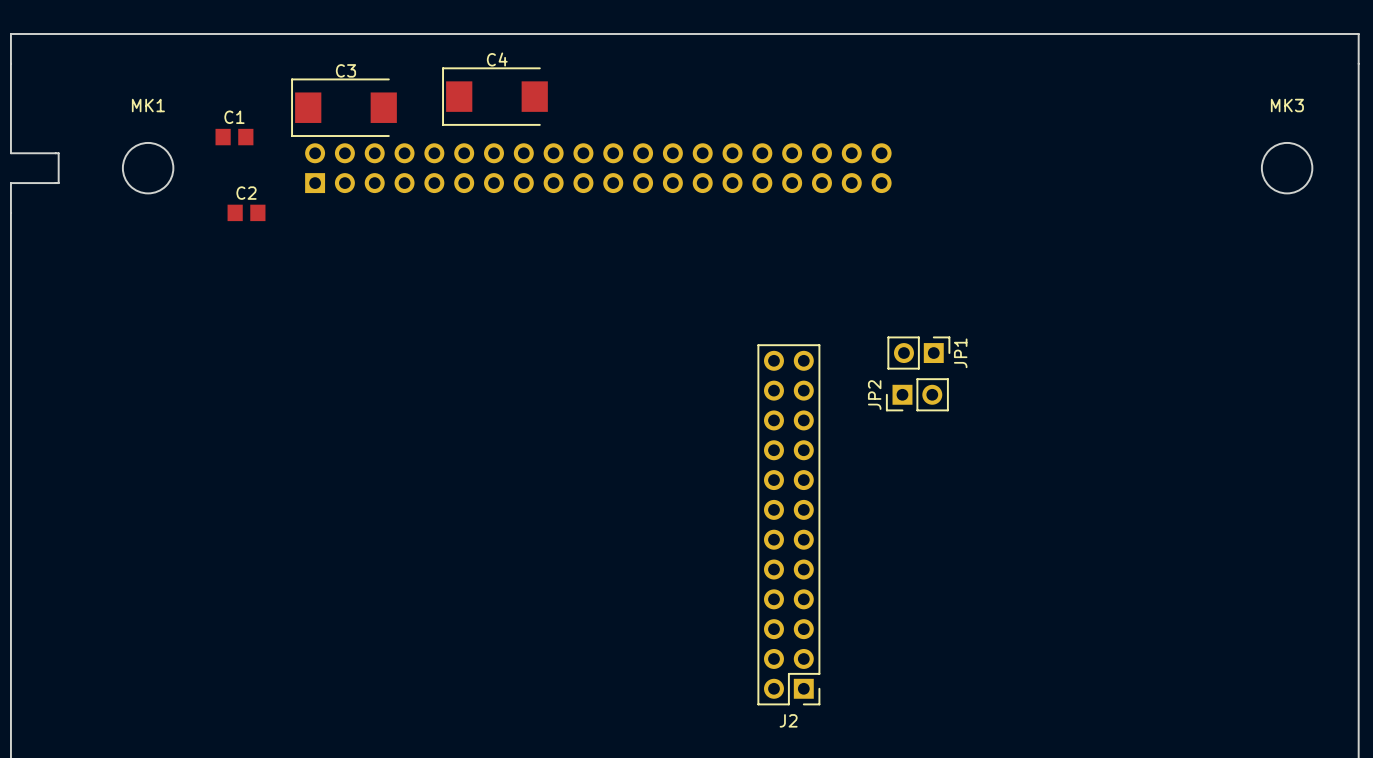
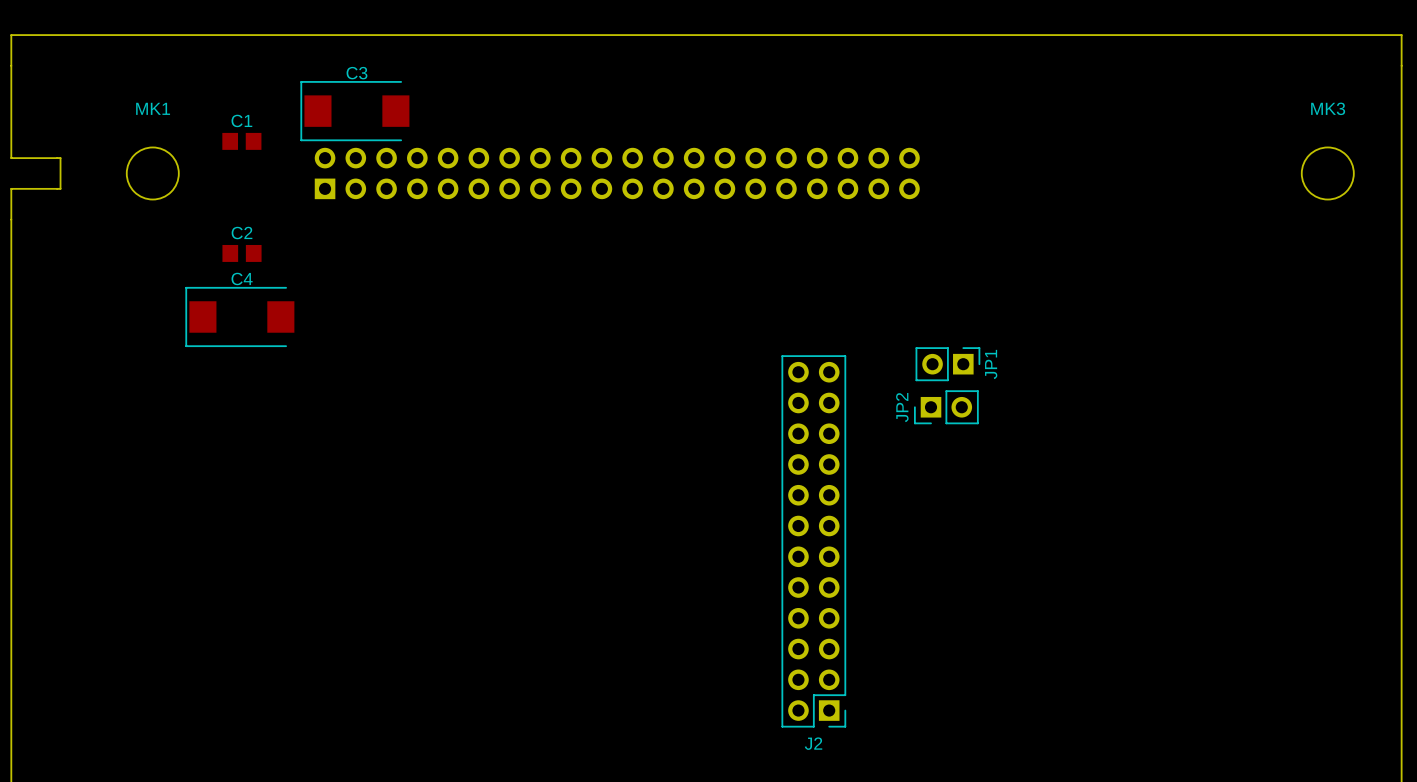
C4 position: (495, 96) -> (239, 316)
C2 position: (246, 212) -> (242, 253)

